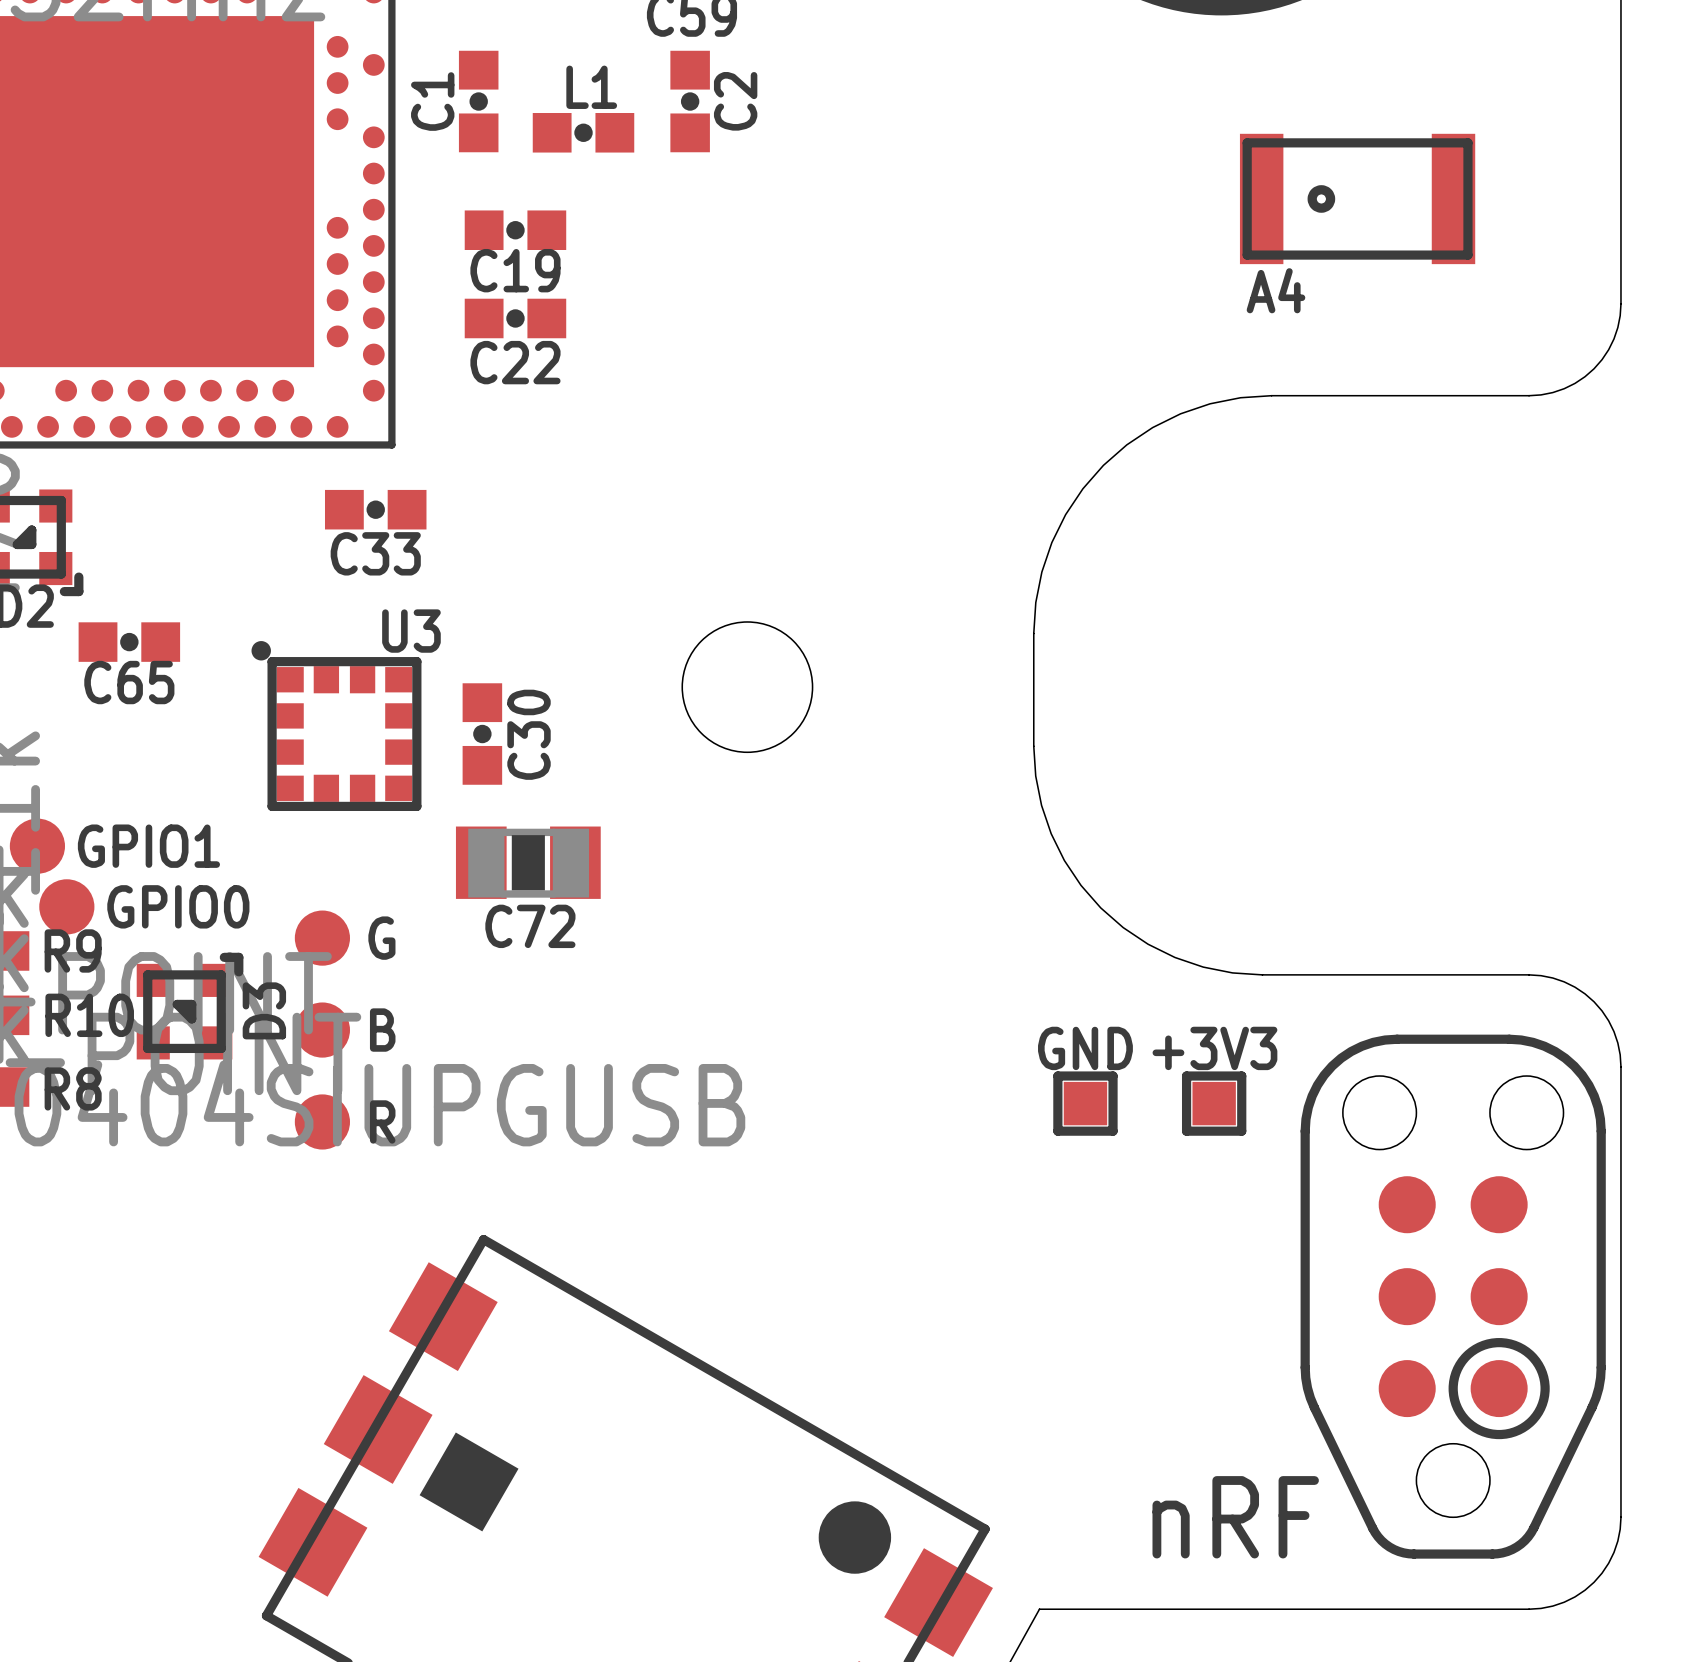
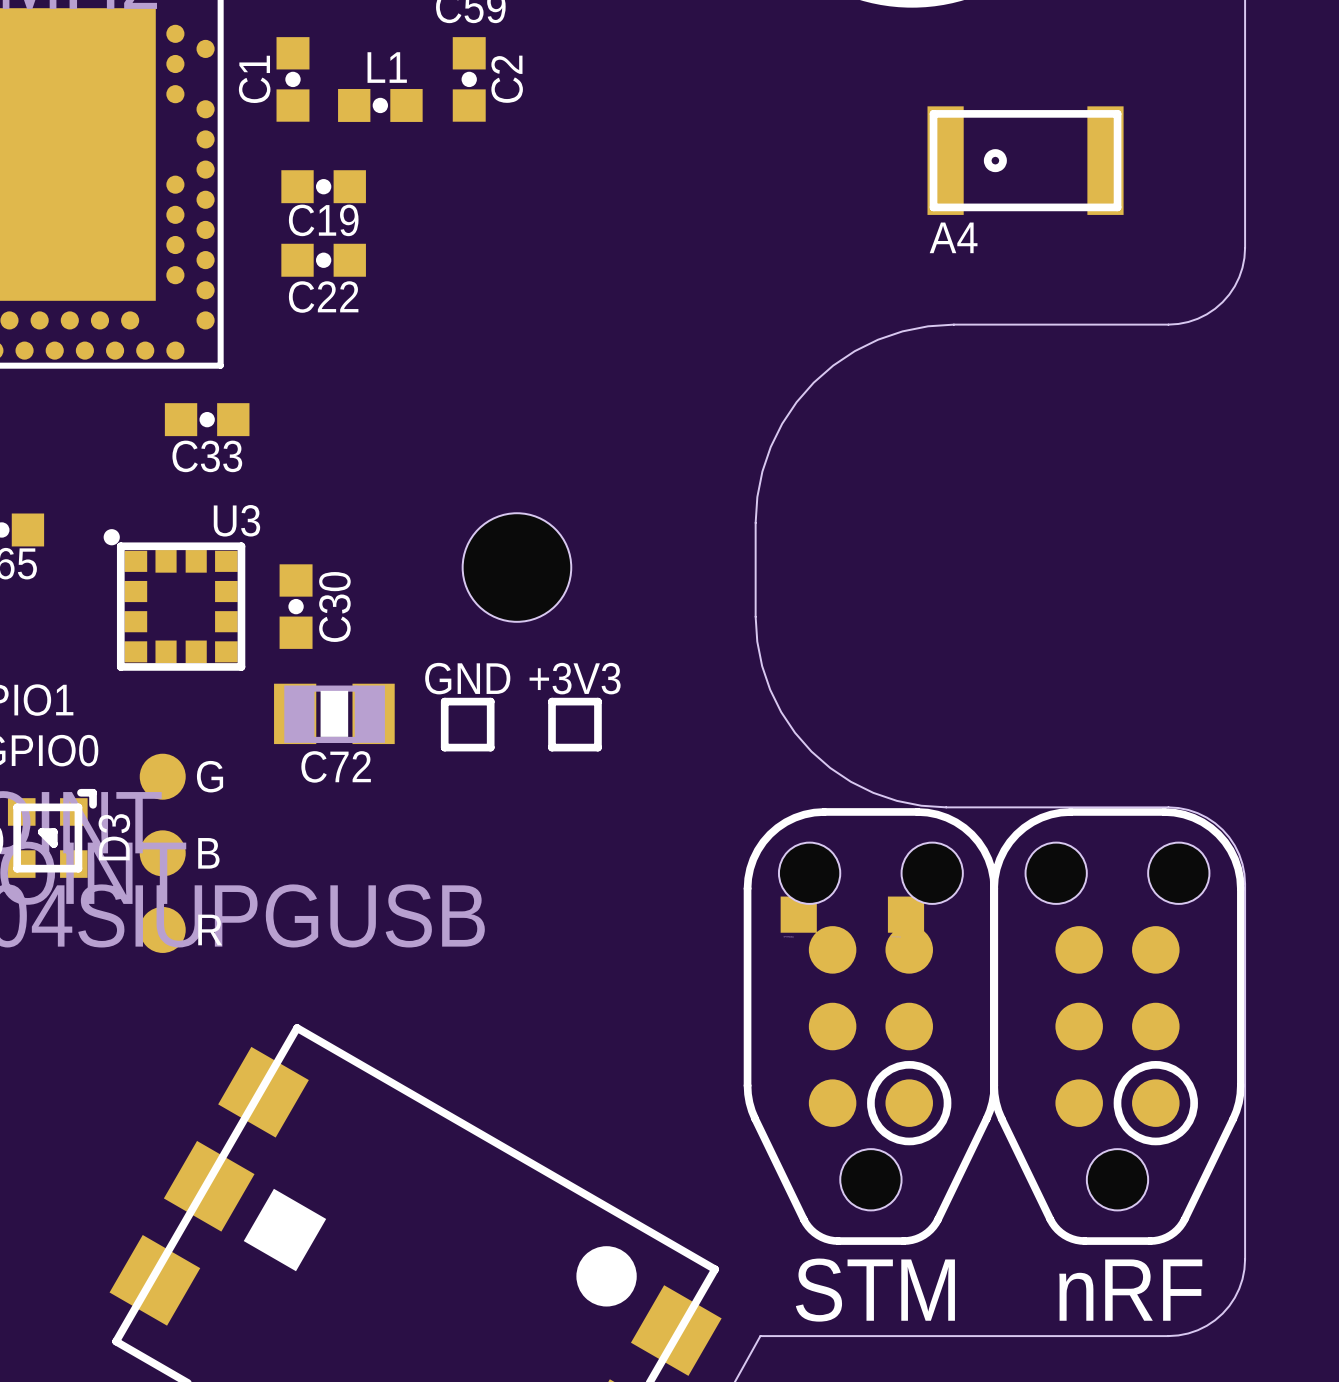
text position: GND (1085, 1048) -> GND (467, 678)
text position: +3V3 (1214, 1048) -> +3V3 (575, 678)
line: (1057, 1076) (1113, 1076) (1113, 1131) (1057, 1131) (1057, 1076) -> (444, 701) (490, 701) (490, 747) (444, 747) (444, 701)
line: (1186, 1076) (1241, 1076) (1241, 1131) (1186, 1131) (1186, 1076) -> (551, 701) (597, 701) (597, 747) (551, 747) (551, 701)
part: none -> (870, 1026)
part position: (1453, 1296) -> (1117, 1026)
text position: nRF (1235, 1517) -> nRF (1130, 1290)
text: none -> STM (875, 1290)

